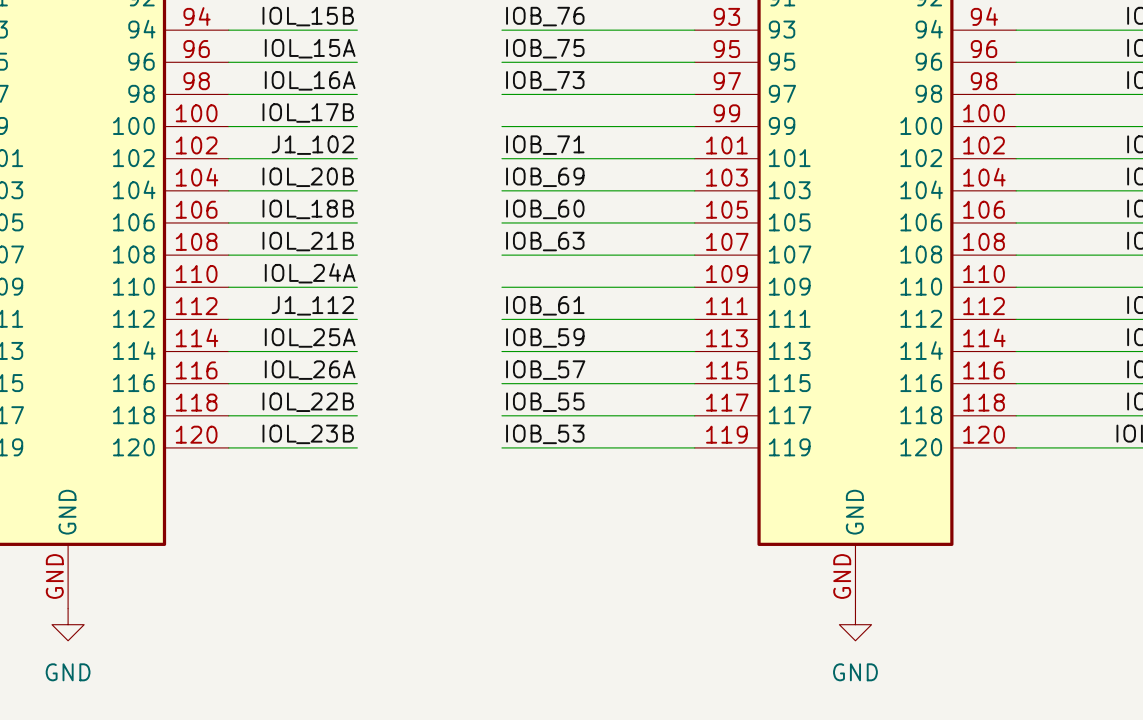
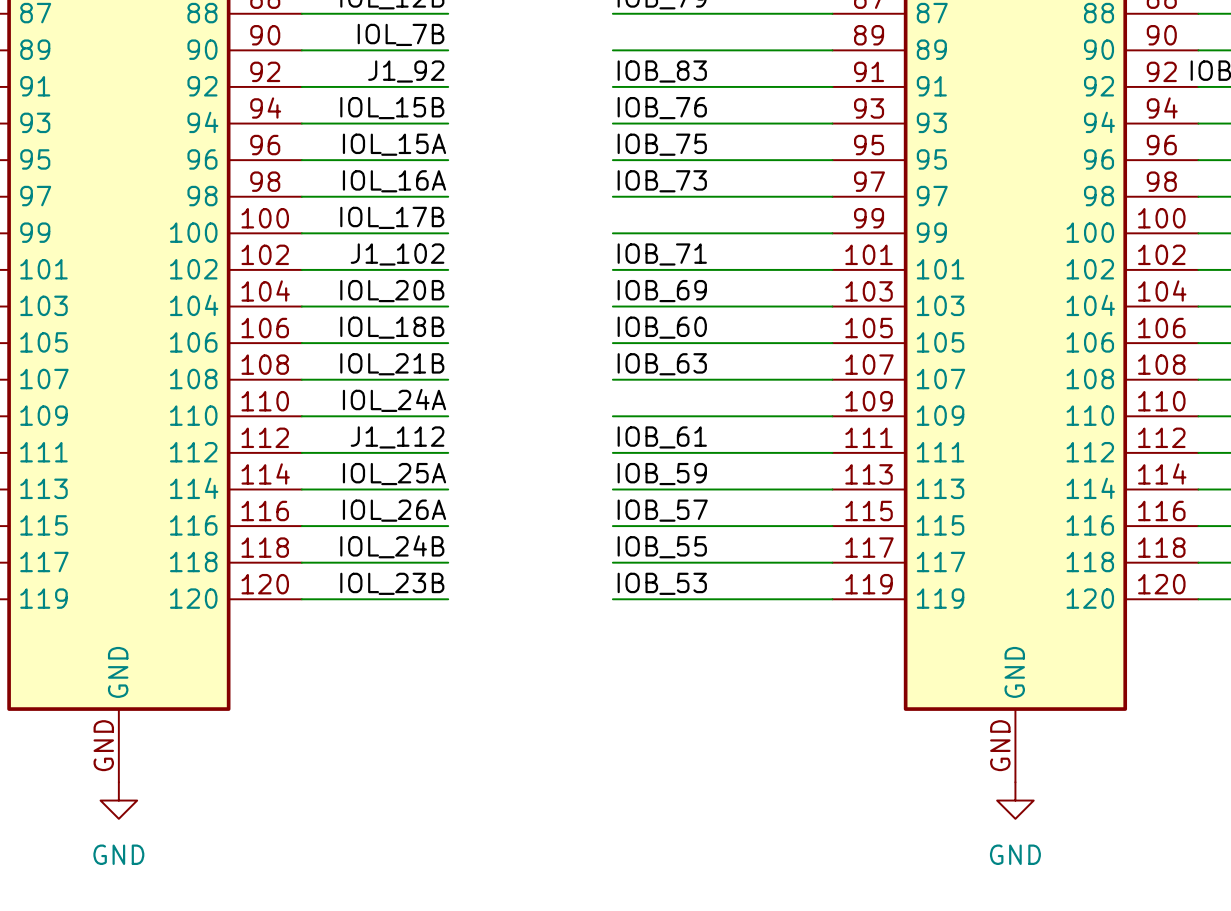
label: IOL_22B (308, 402) -> IOL_24B (392, 546)

